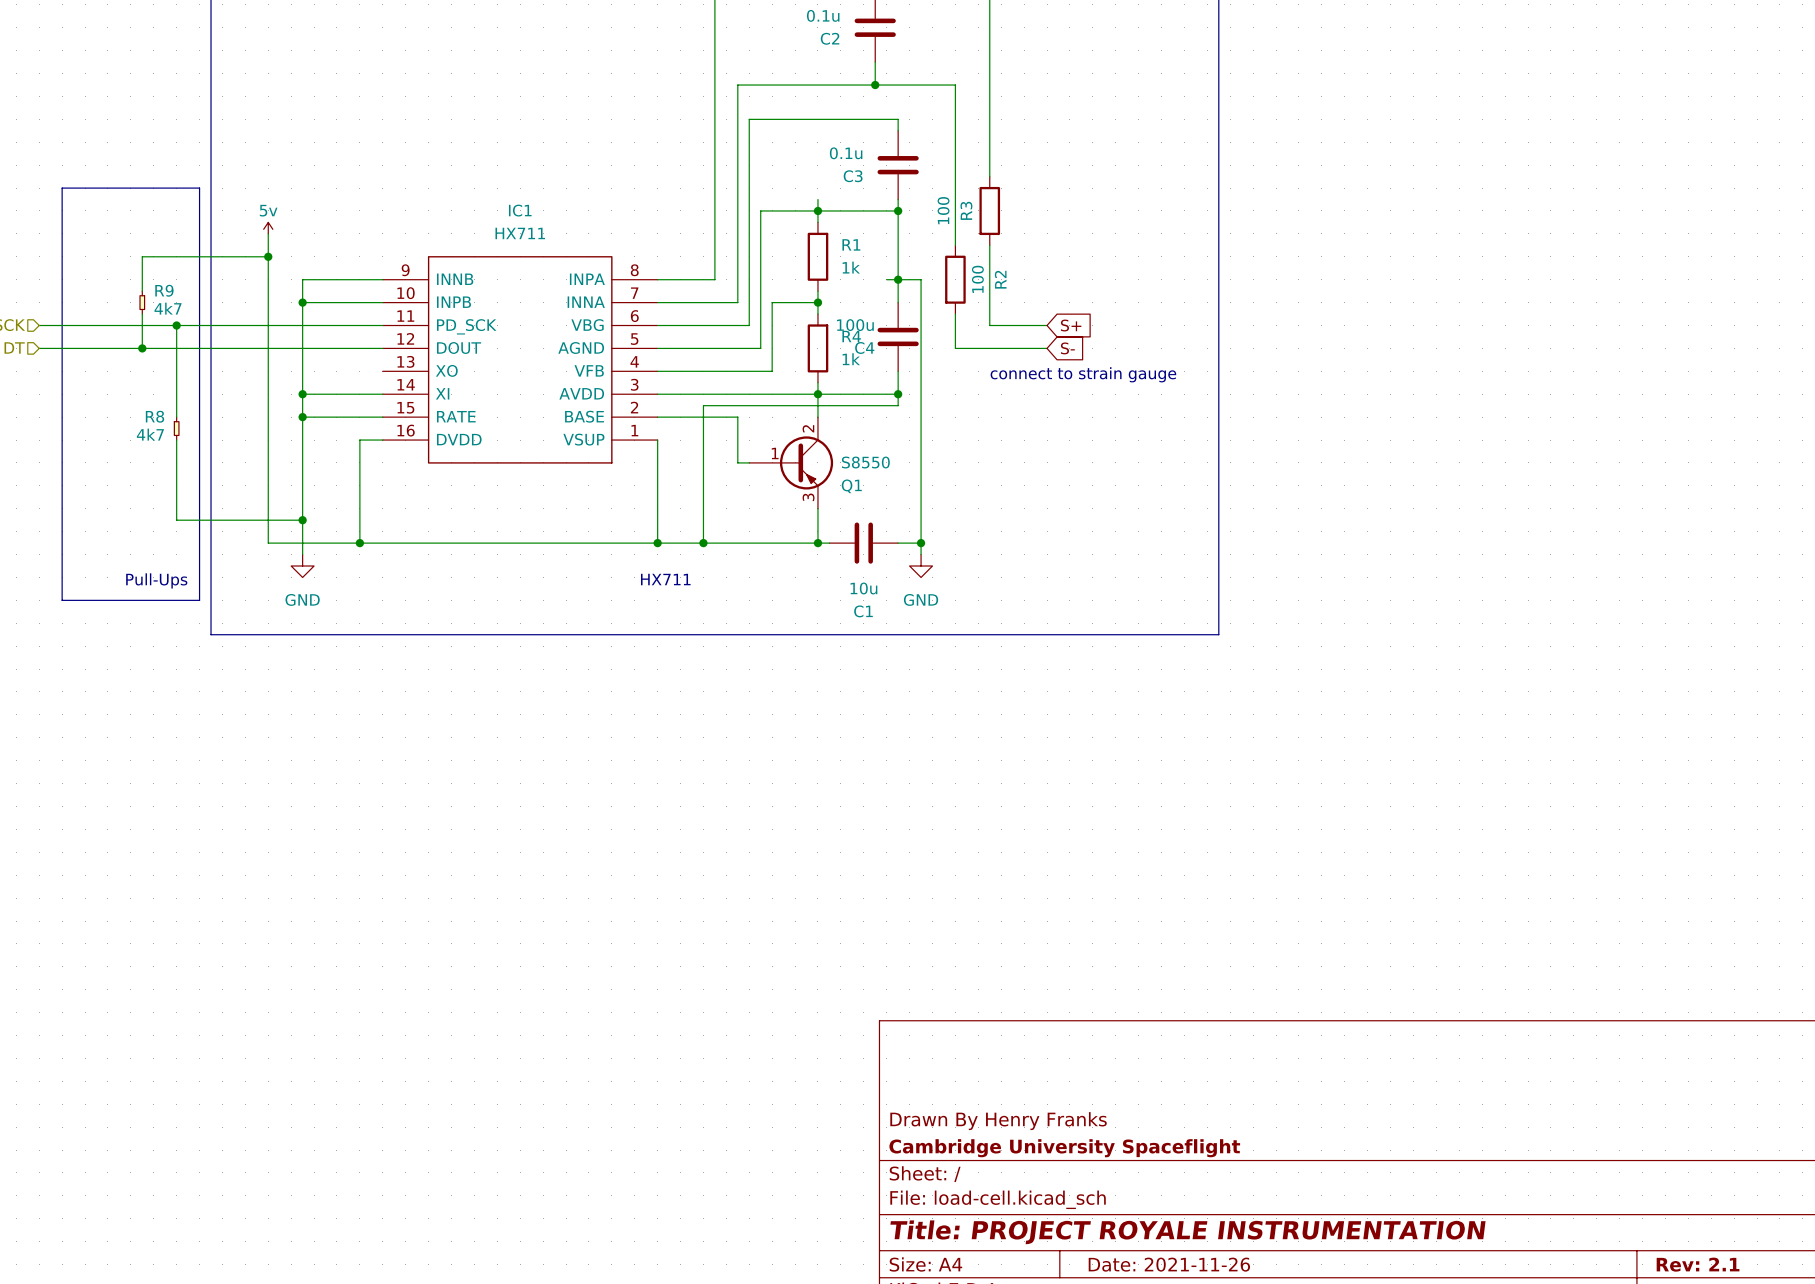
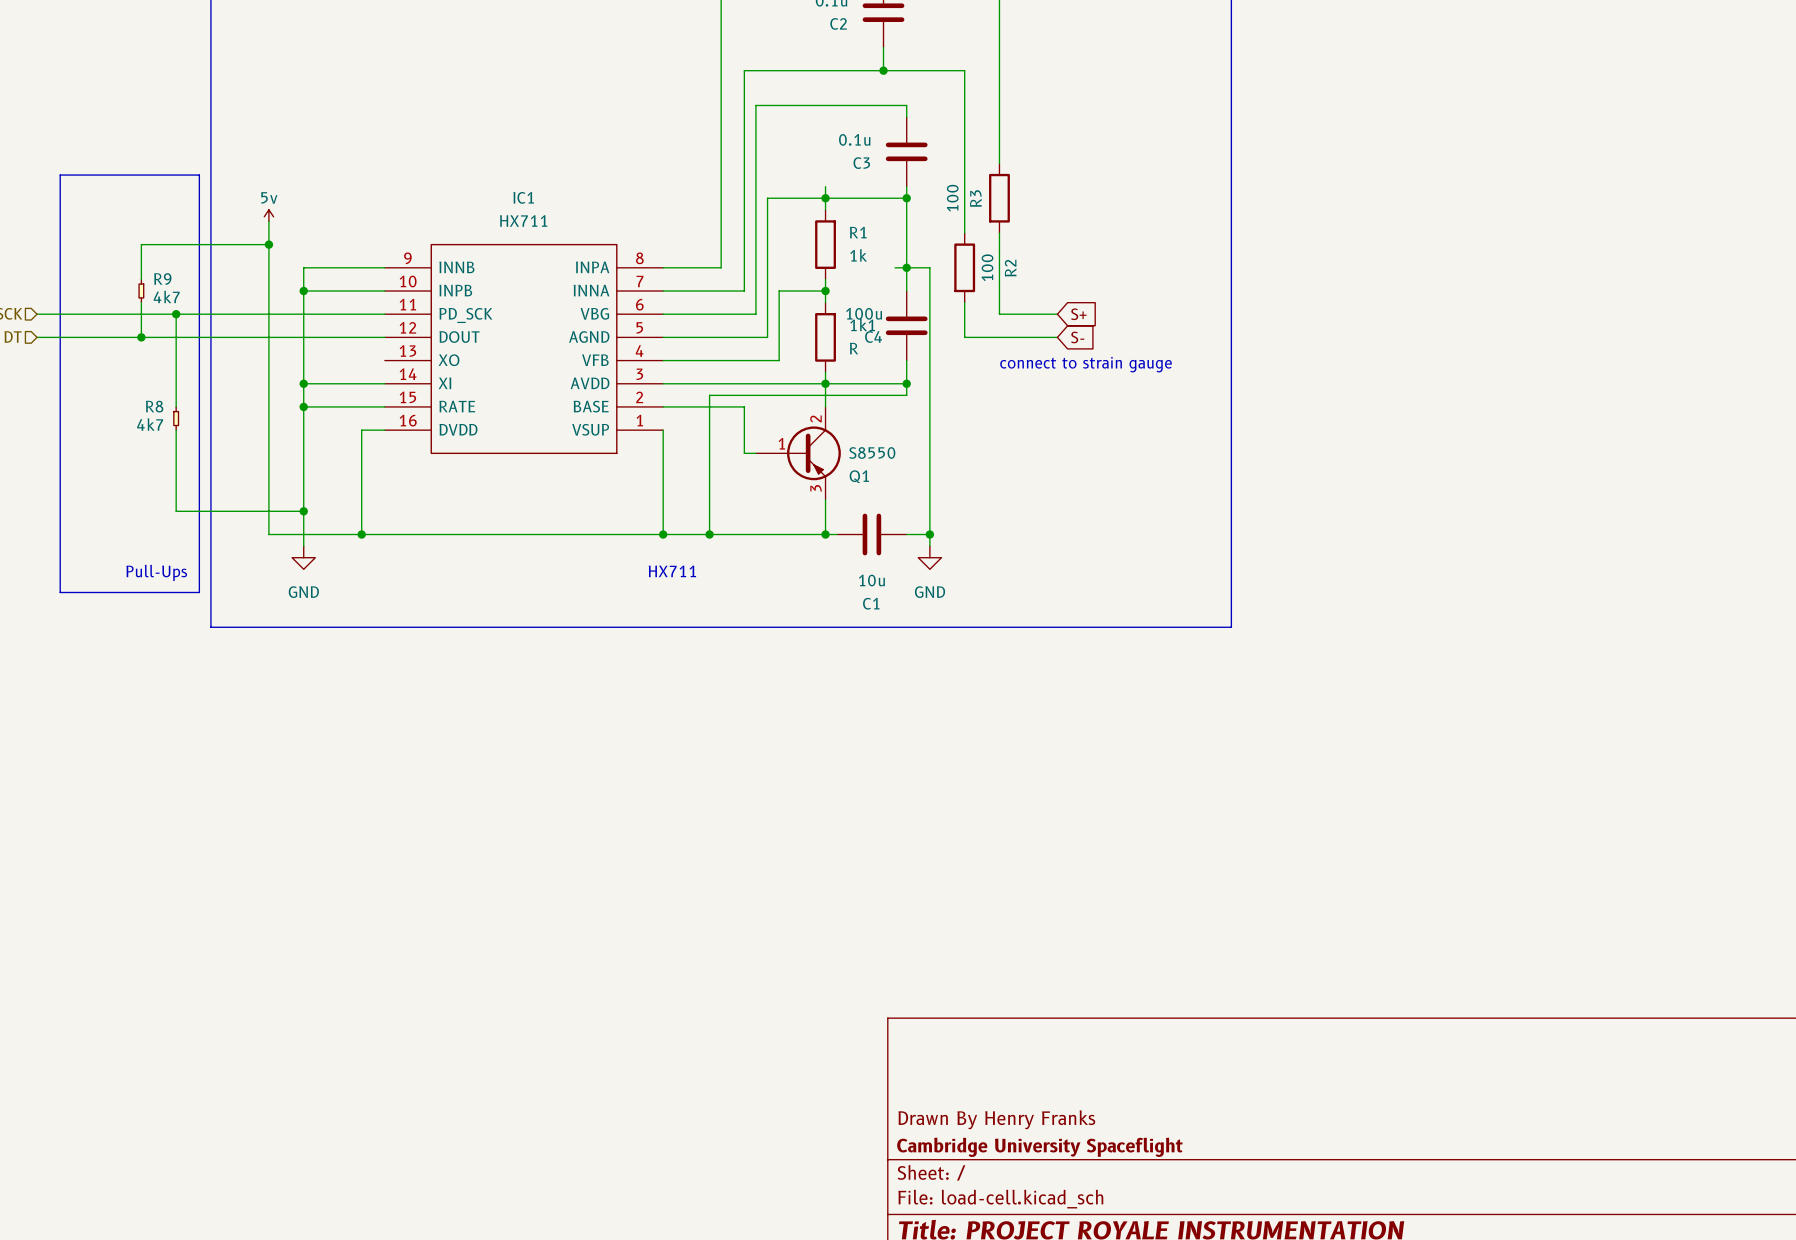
R4 name: R4 (851, 336) -> 1k1 (862, 324)
R4 value: 1k (851, 359) -> R (854, 348)

